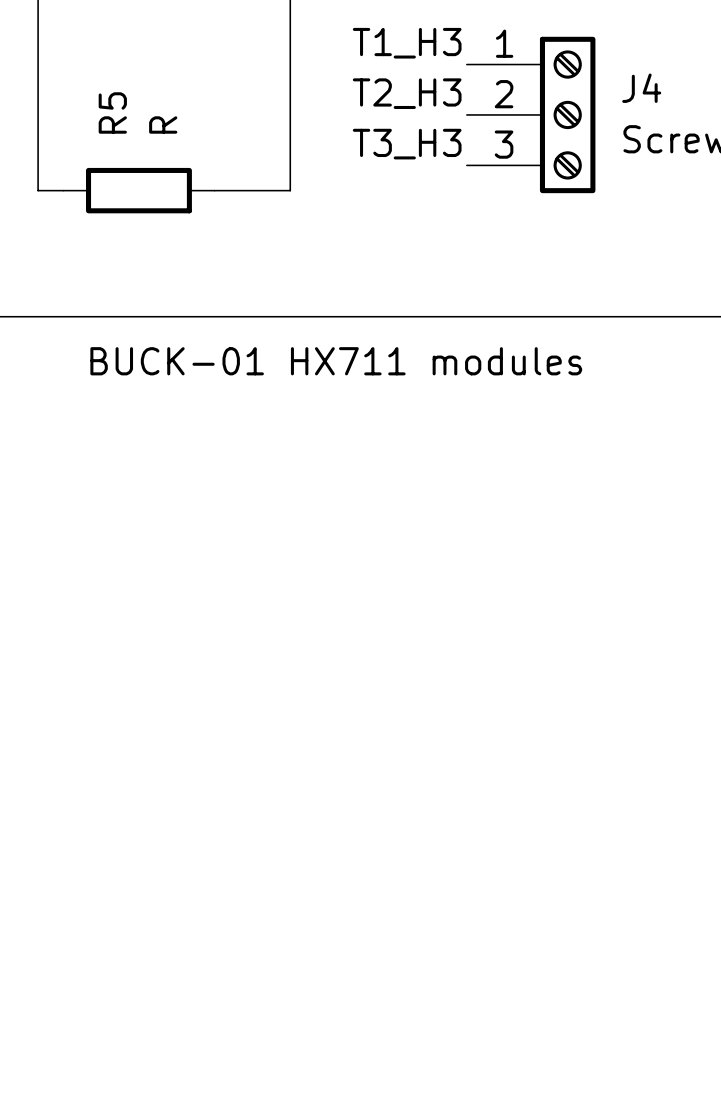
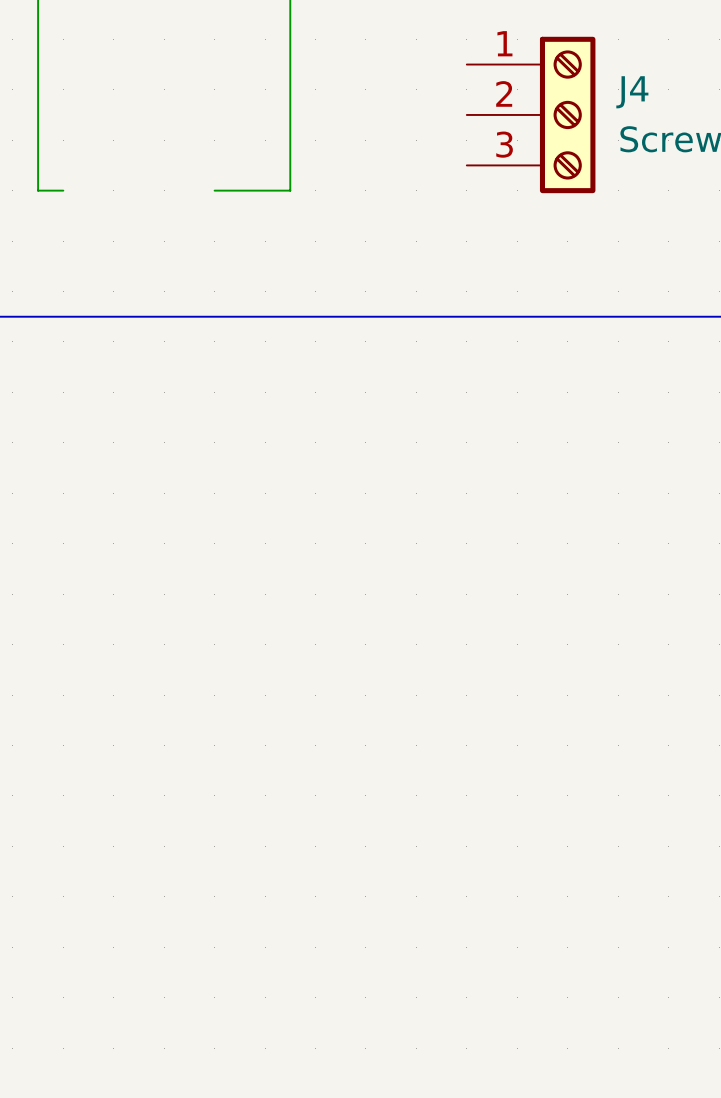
label: T1_H3 (407, 43) -> none
label: T2_H3 (407, 93) -> none
label: T3_H3 (407, 144) -> none
R5: R (138, 190) -> none
text: BUCK-01 HX711 modules (336, 361) -> none

